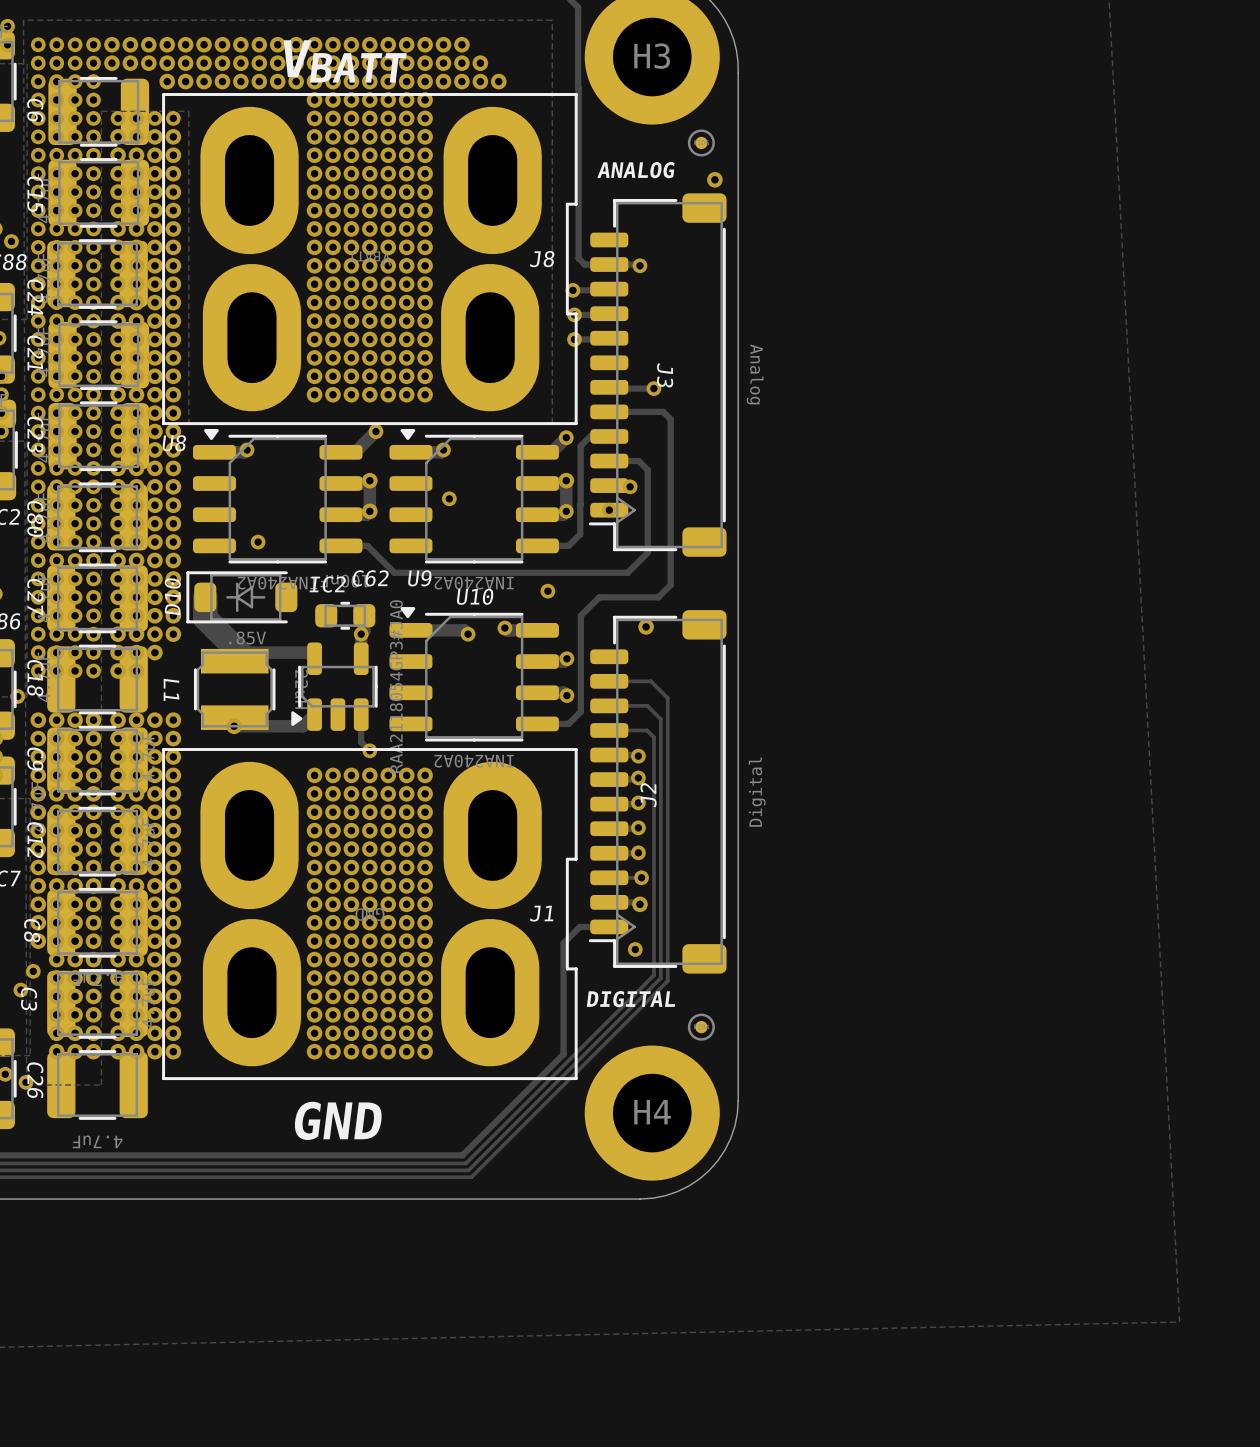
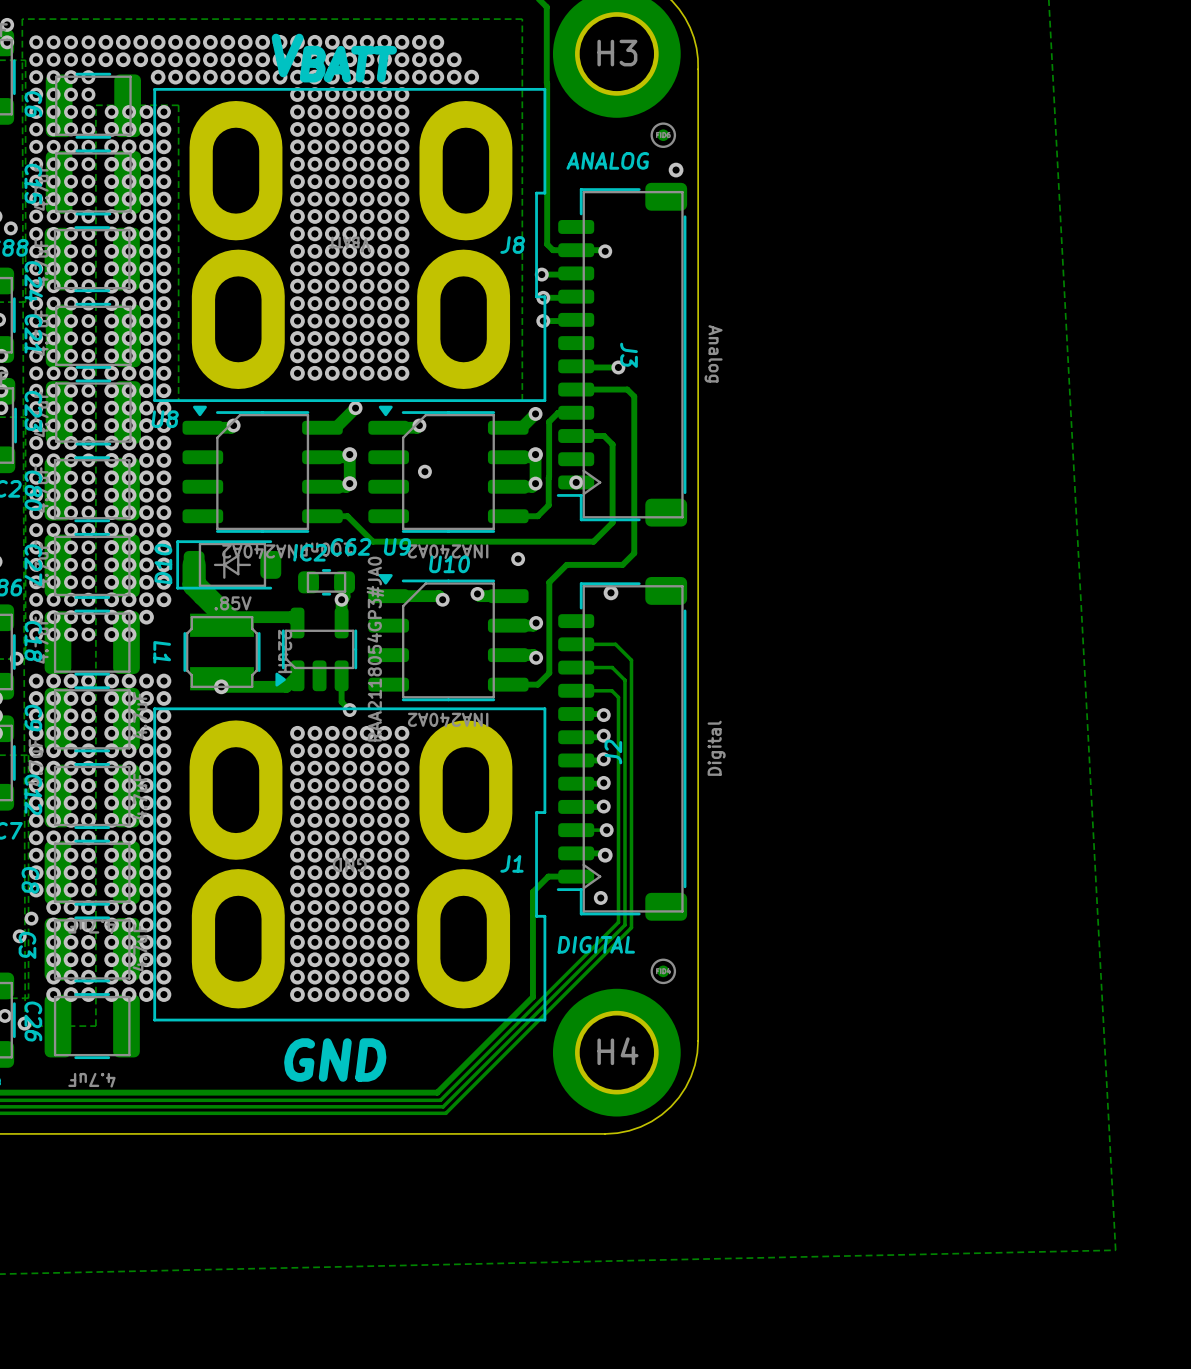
via: (630, 486) -> none
via: (258, 542) -> none

